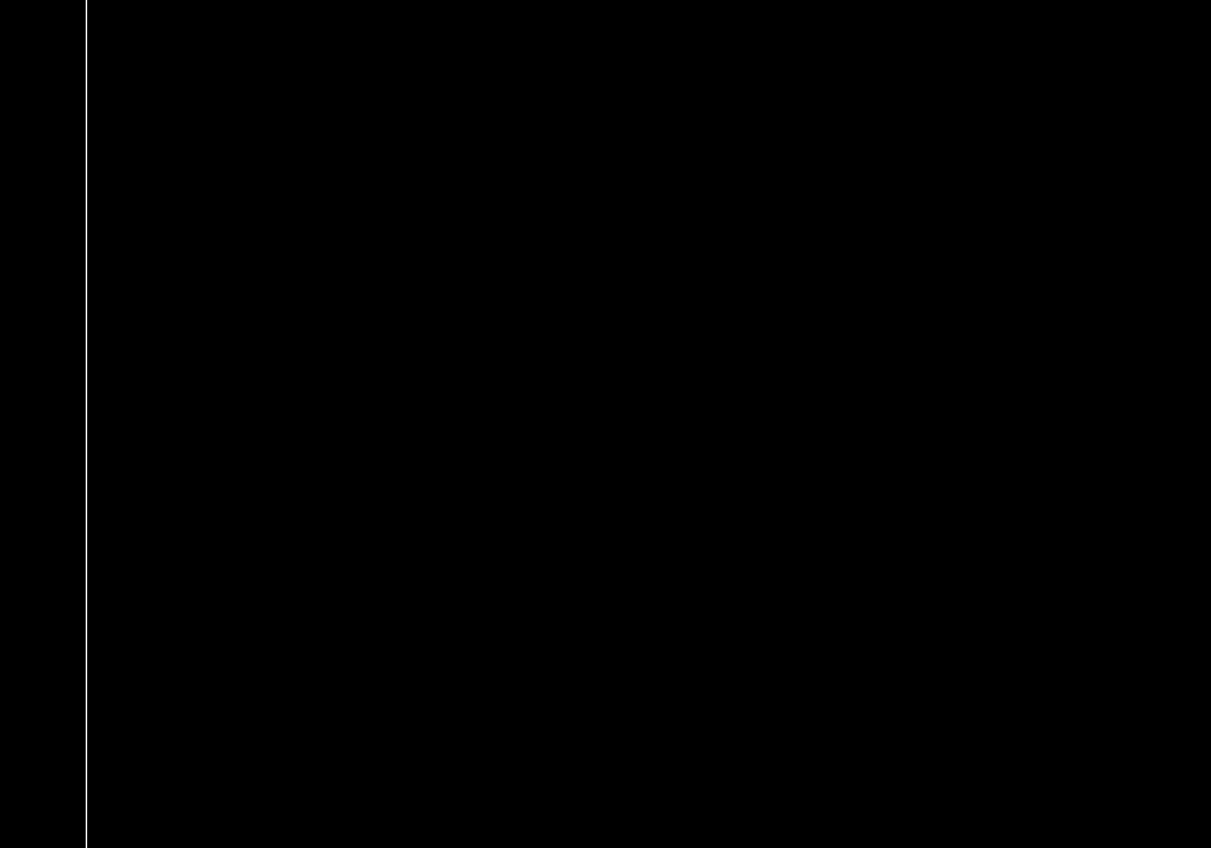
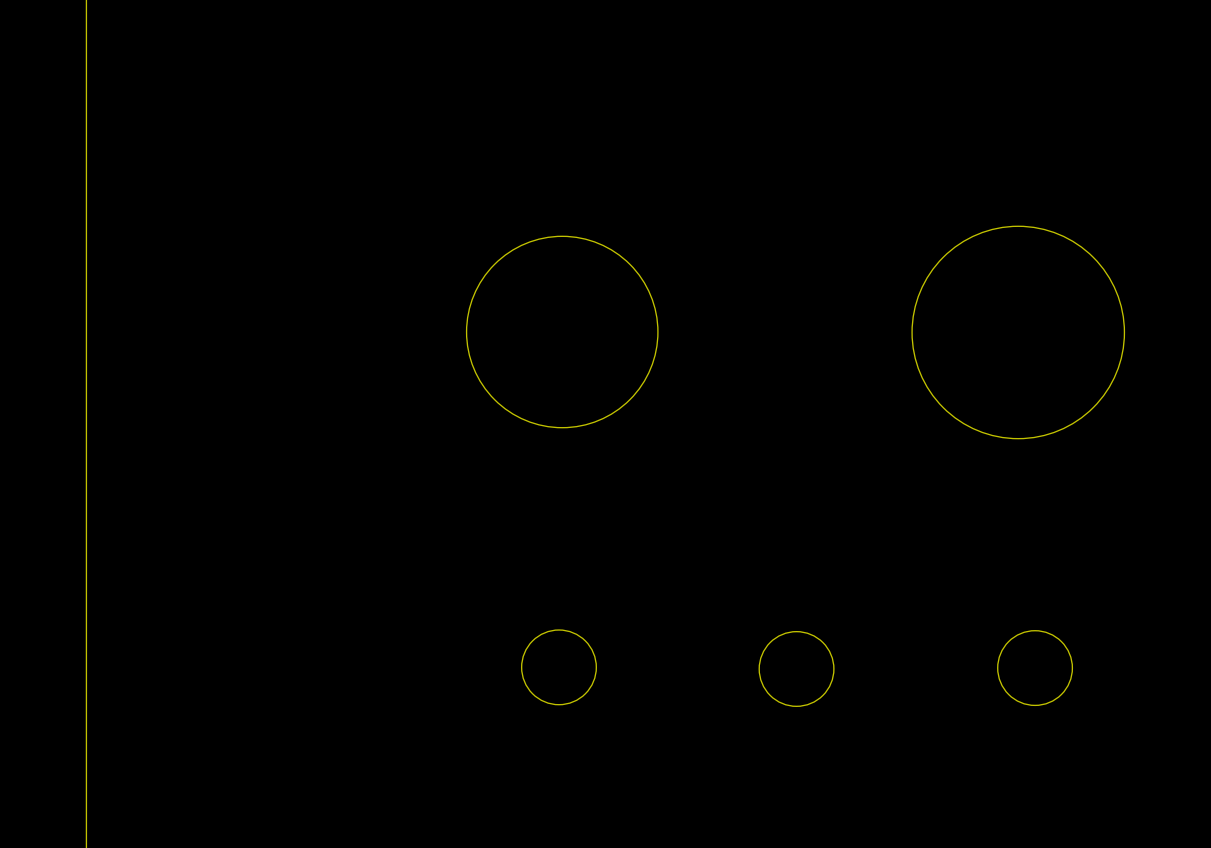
round board edge: none -> [911, 225, 1126, 440]
round board edge: none -> [465, 235, 659, 429]
round board edge: none -> [521, 629, 597, 706]
round board edge: none -> [997, 630, 1073, 706]
round board edge: none -> [758, 631, 835, 707]

